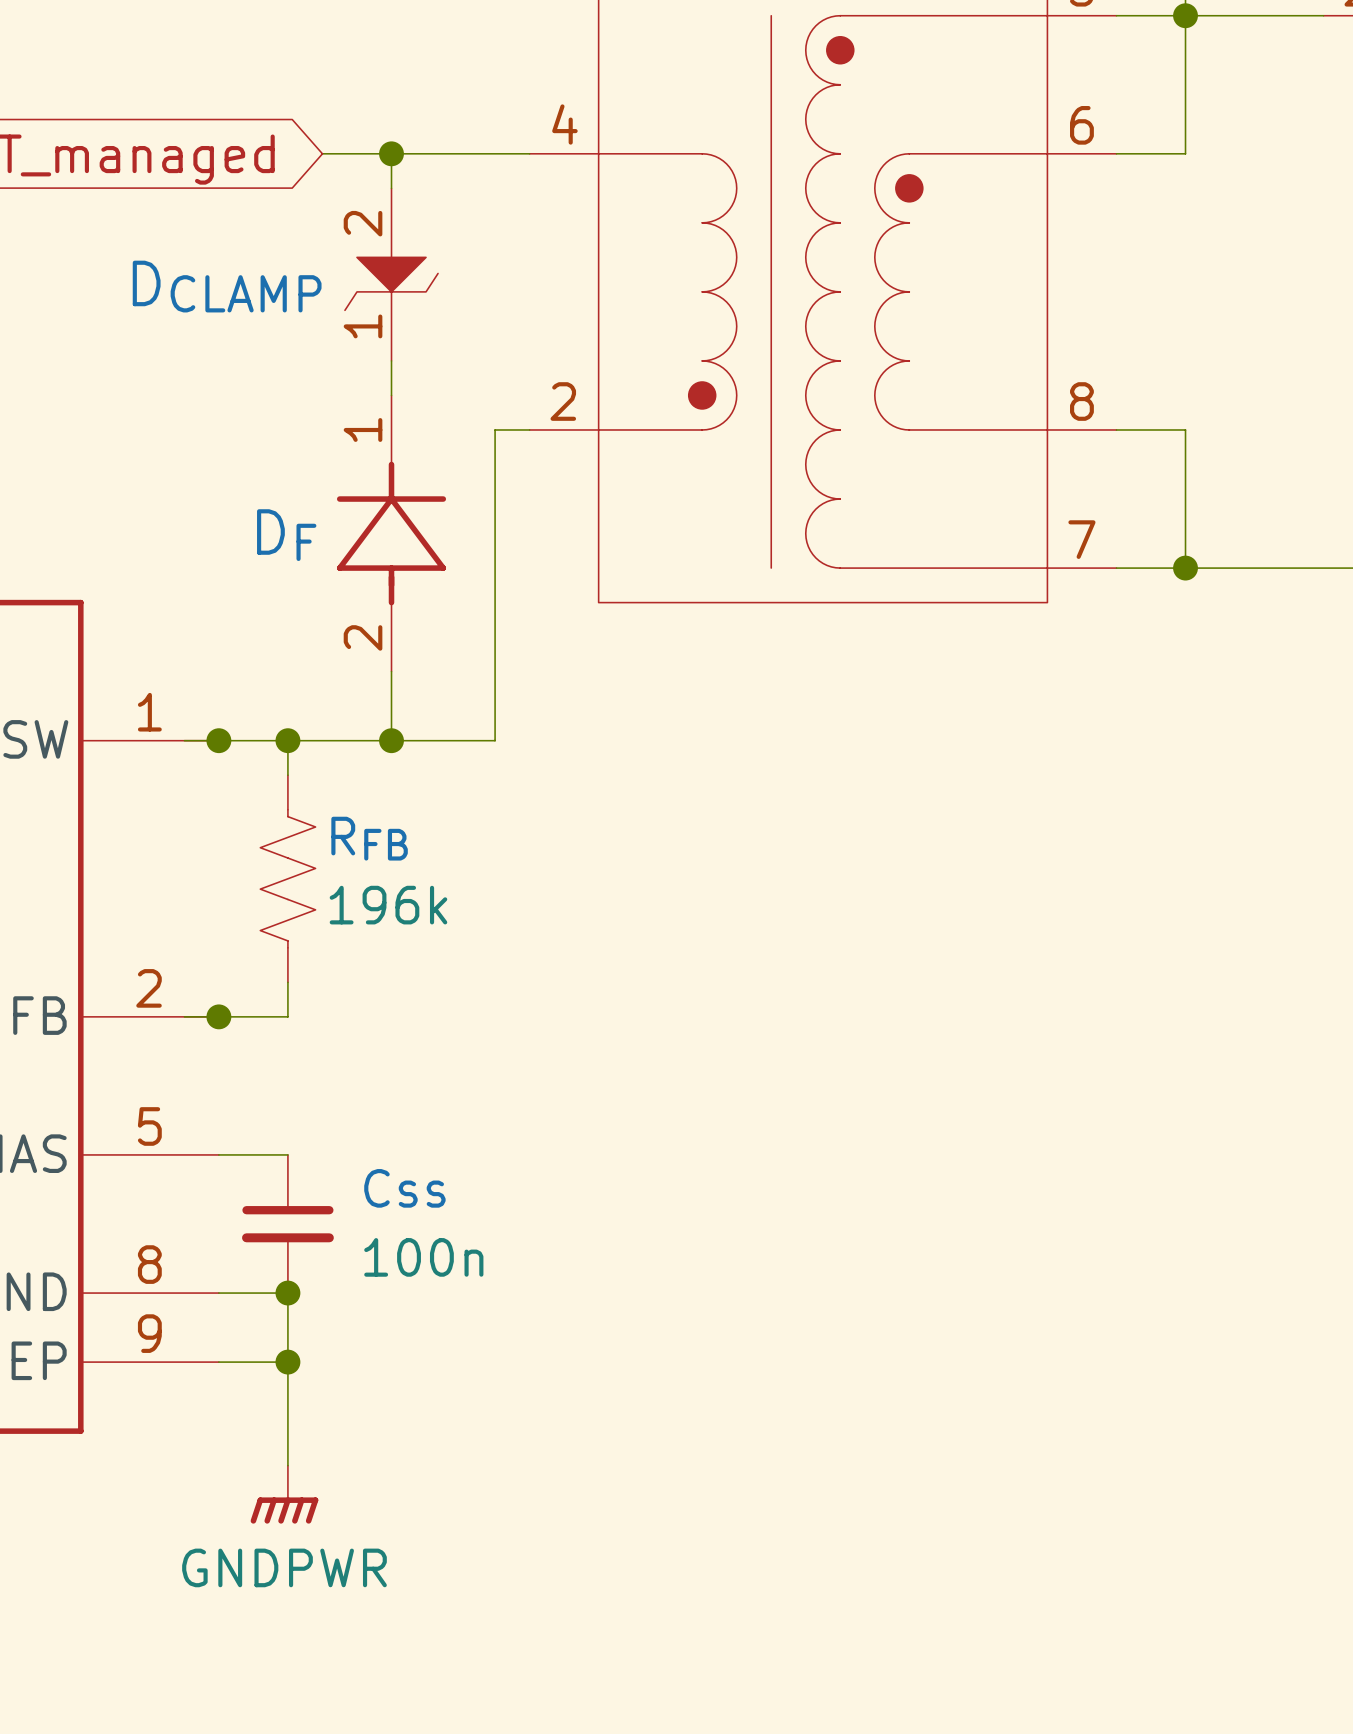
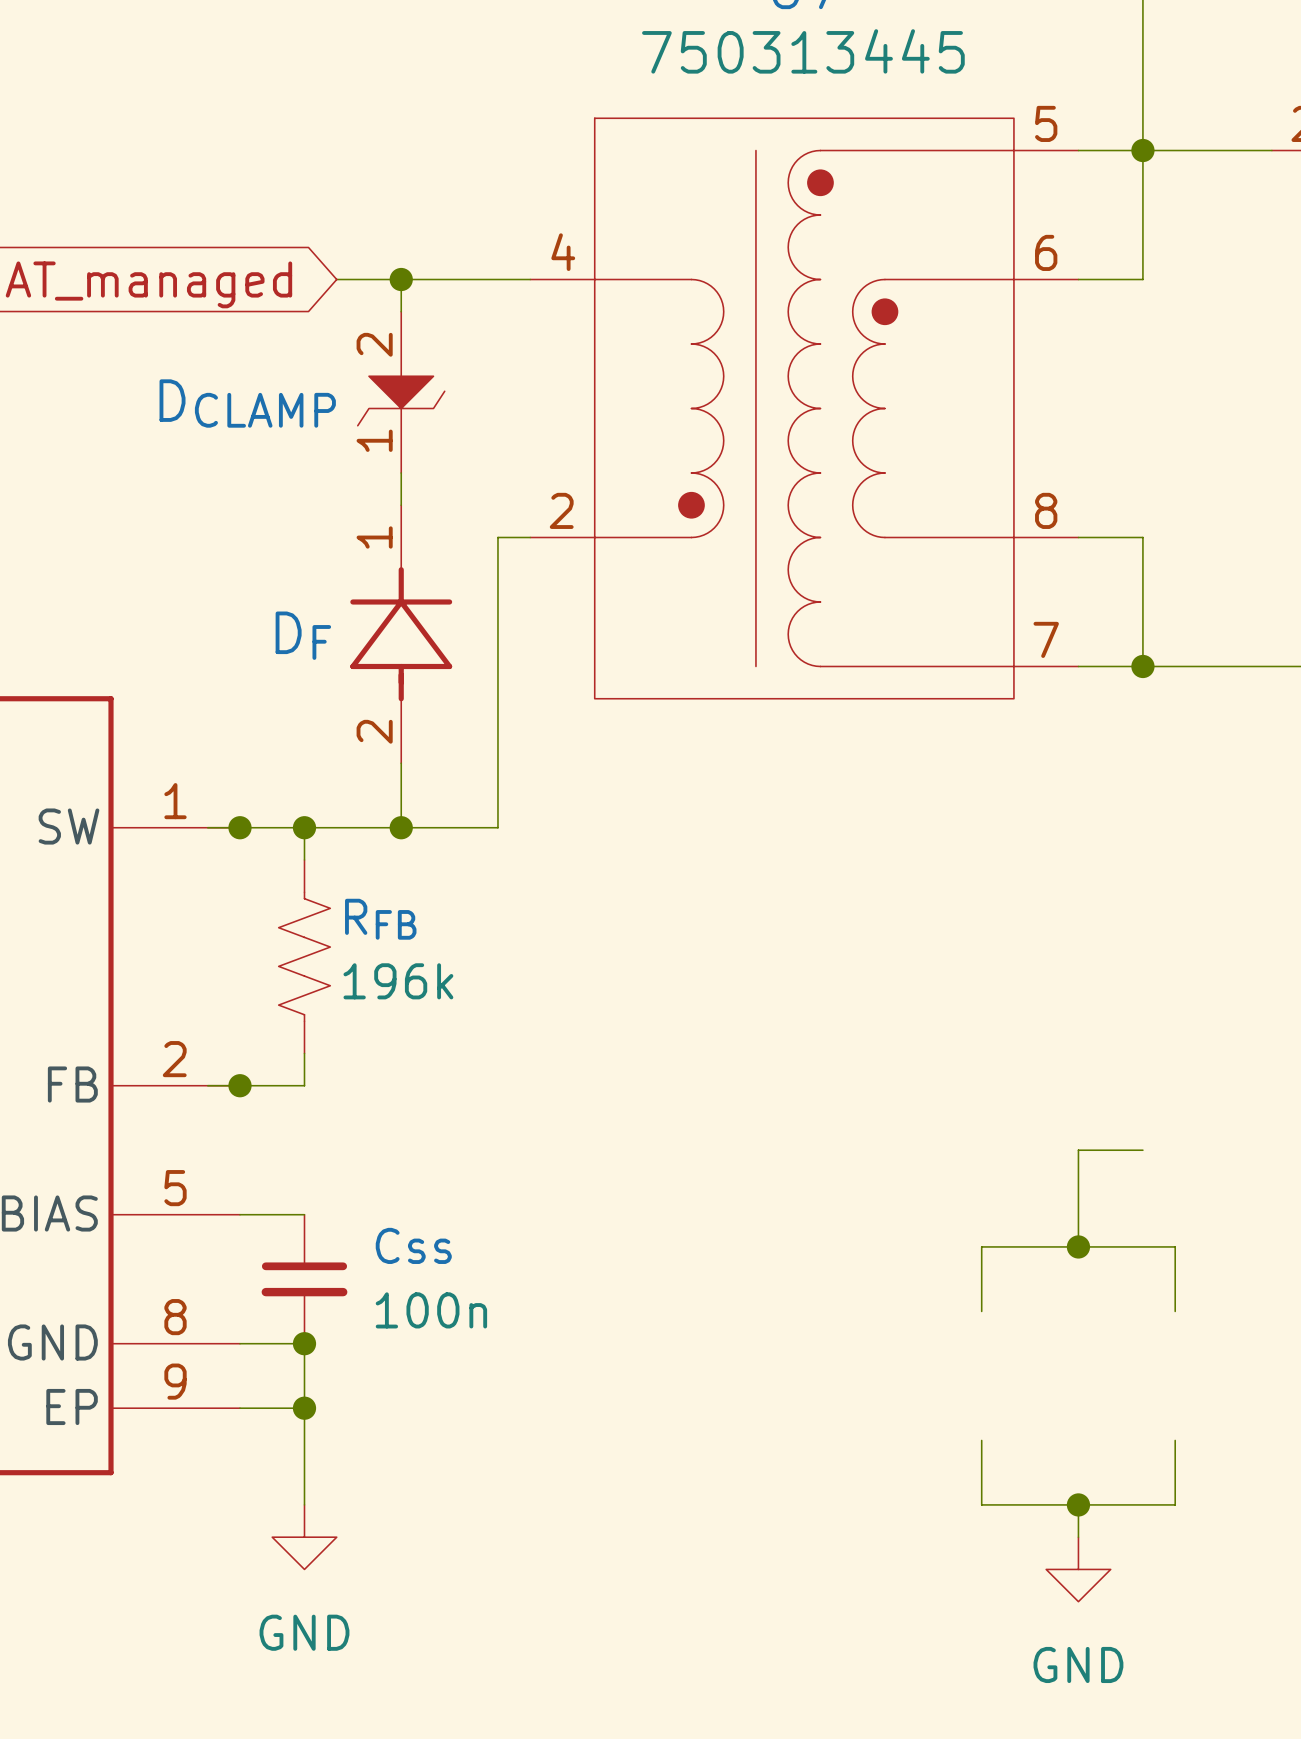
wire: none -> (1142, 1150) (1078, 1150) (1078, 1246)
junction: none -> (1078, 1246)
wire: none -> (981, 1311) (981, 1246) (1175, 1246) (1175, 1311)
wire: none -> (981, 1440) (981, 1504) (1175, 1504) (1175, 1440)
wire: none -> (1078, 1504) (1078, 1537)
junction: none -> (1078, 1504)
power symbol: GNDPWR (284, 1494) -> GND (304, 1537)
power symbol: none -> GND (1078, 1569)

